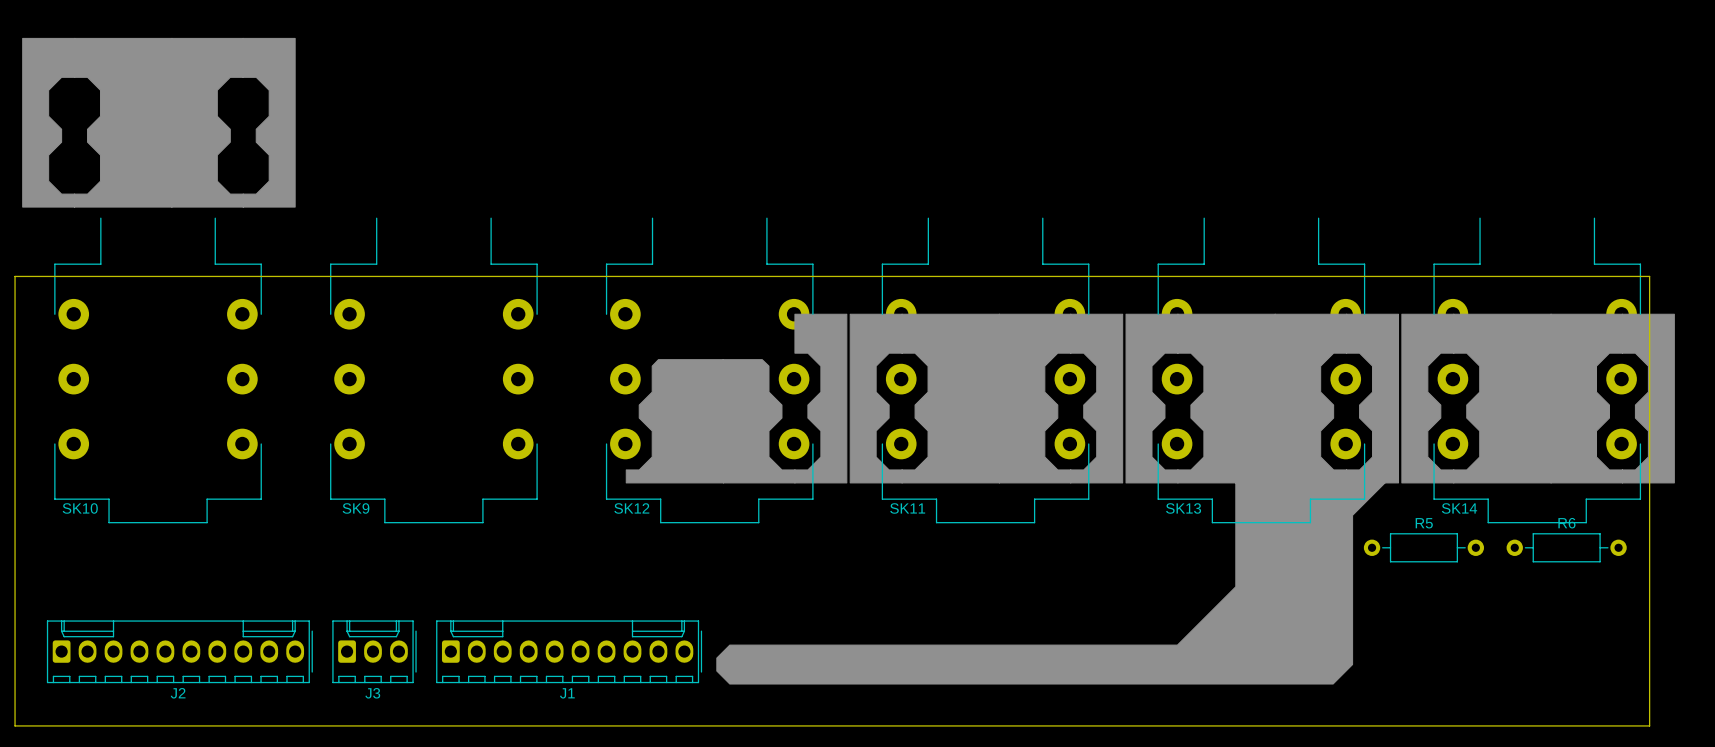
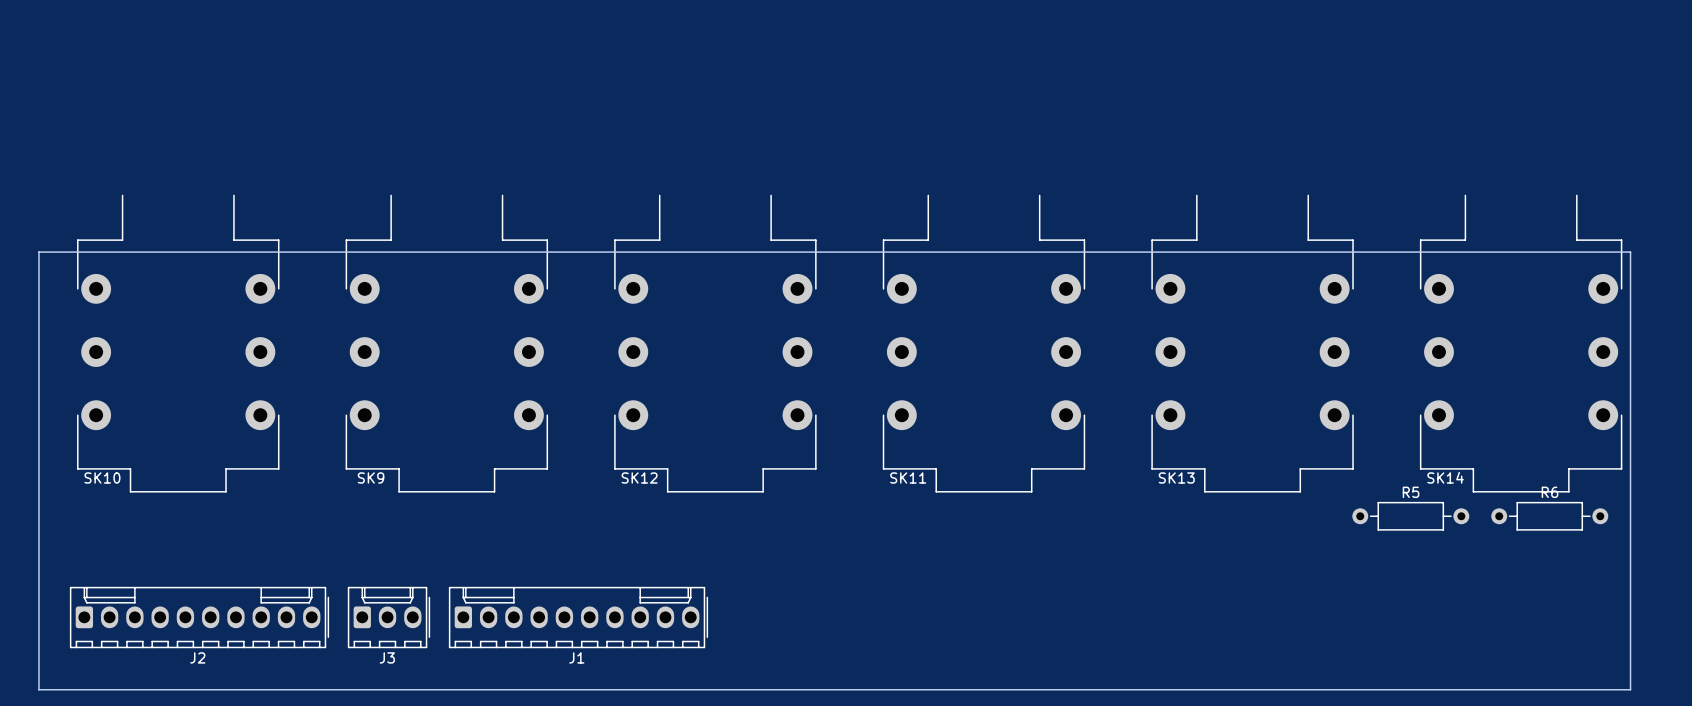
drawing: [22, 37, 296, 208] -> none
drawing: [625, 313, 1675, 685] -> none

